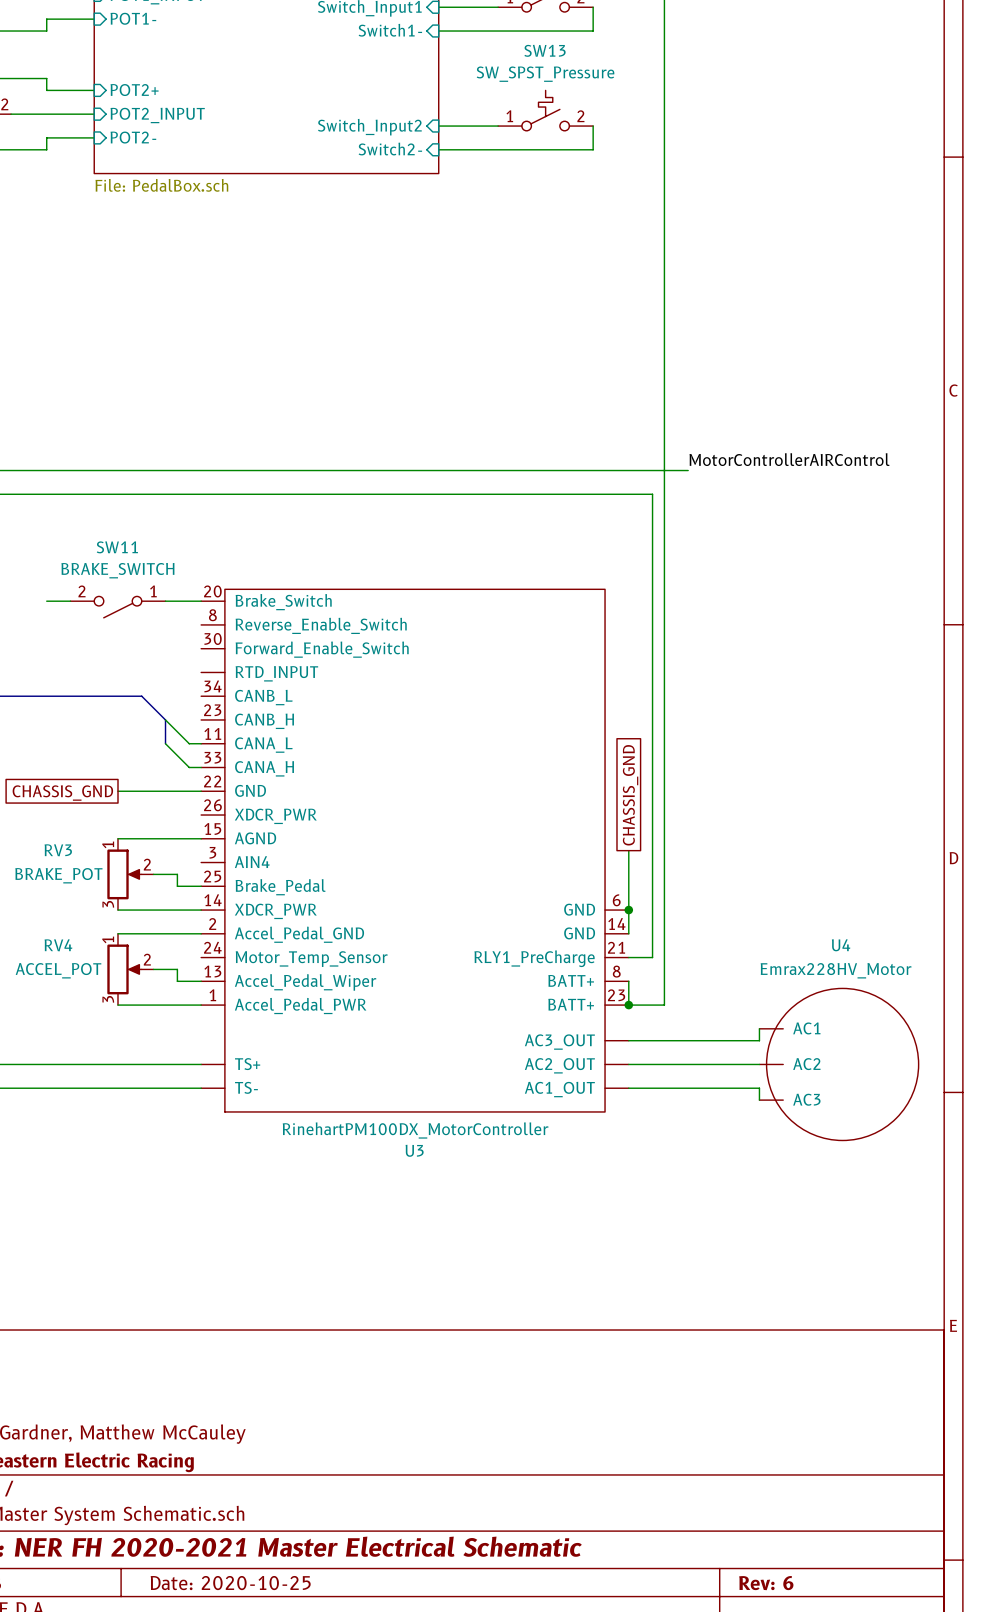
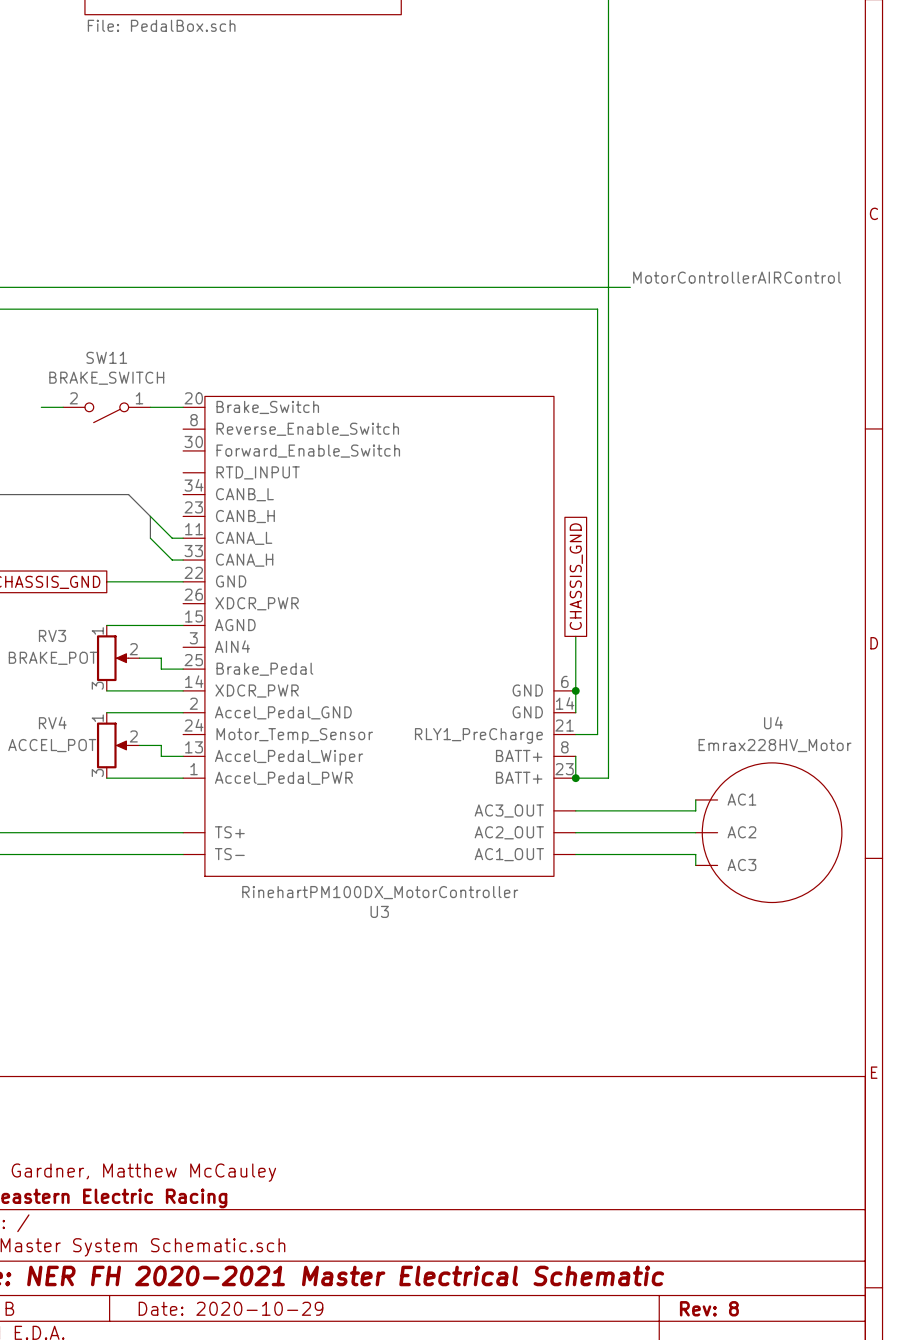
title block: Date: 2020-10-25 (230, 1583) -> Date: 2020-10-29 (231, 1308)
title block: Rev: 6 (766, 1583) -> Rev: 8 (709, 1308)

